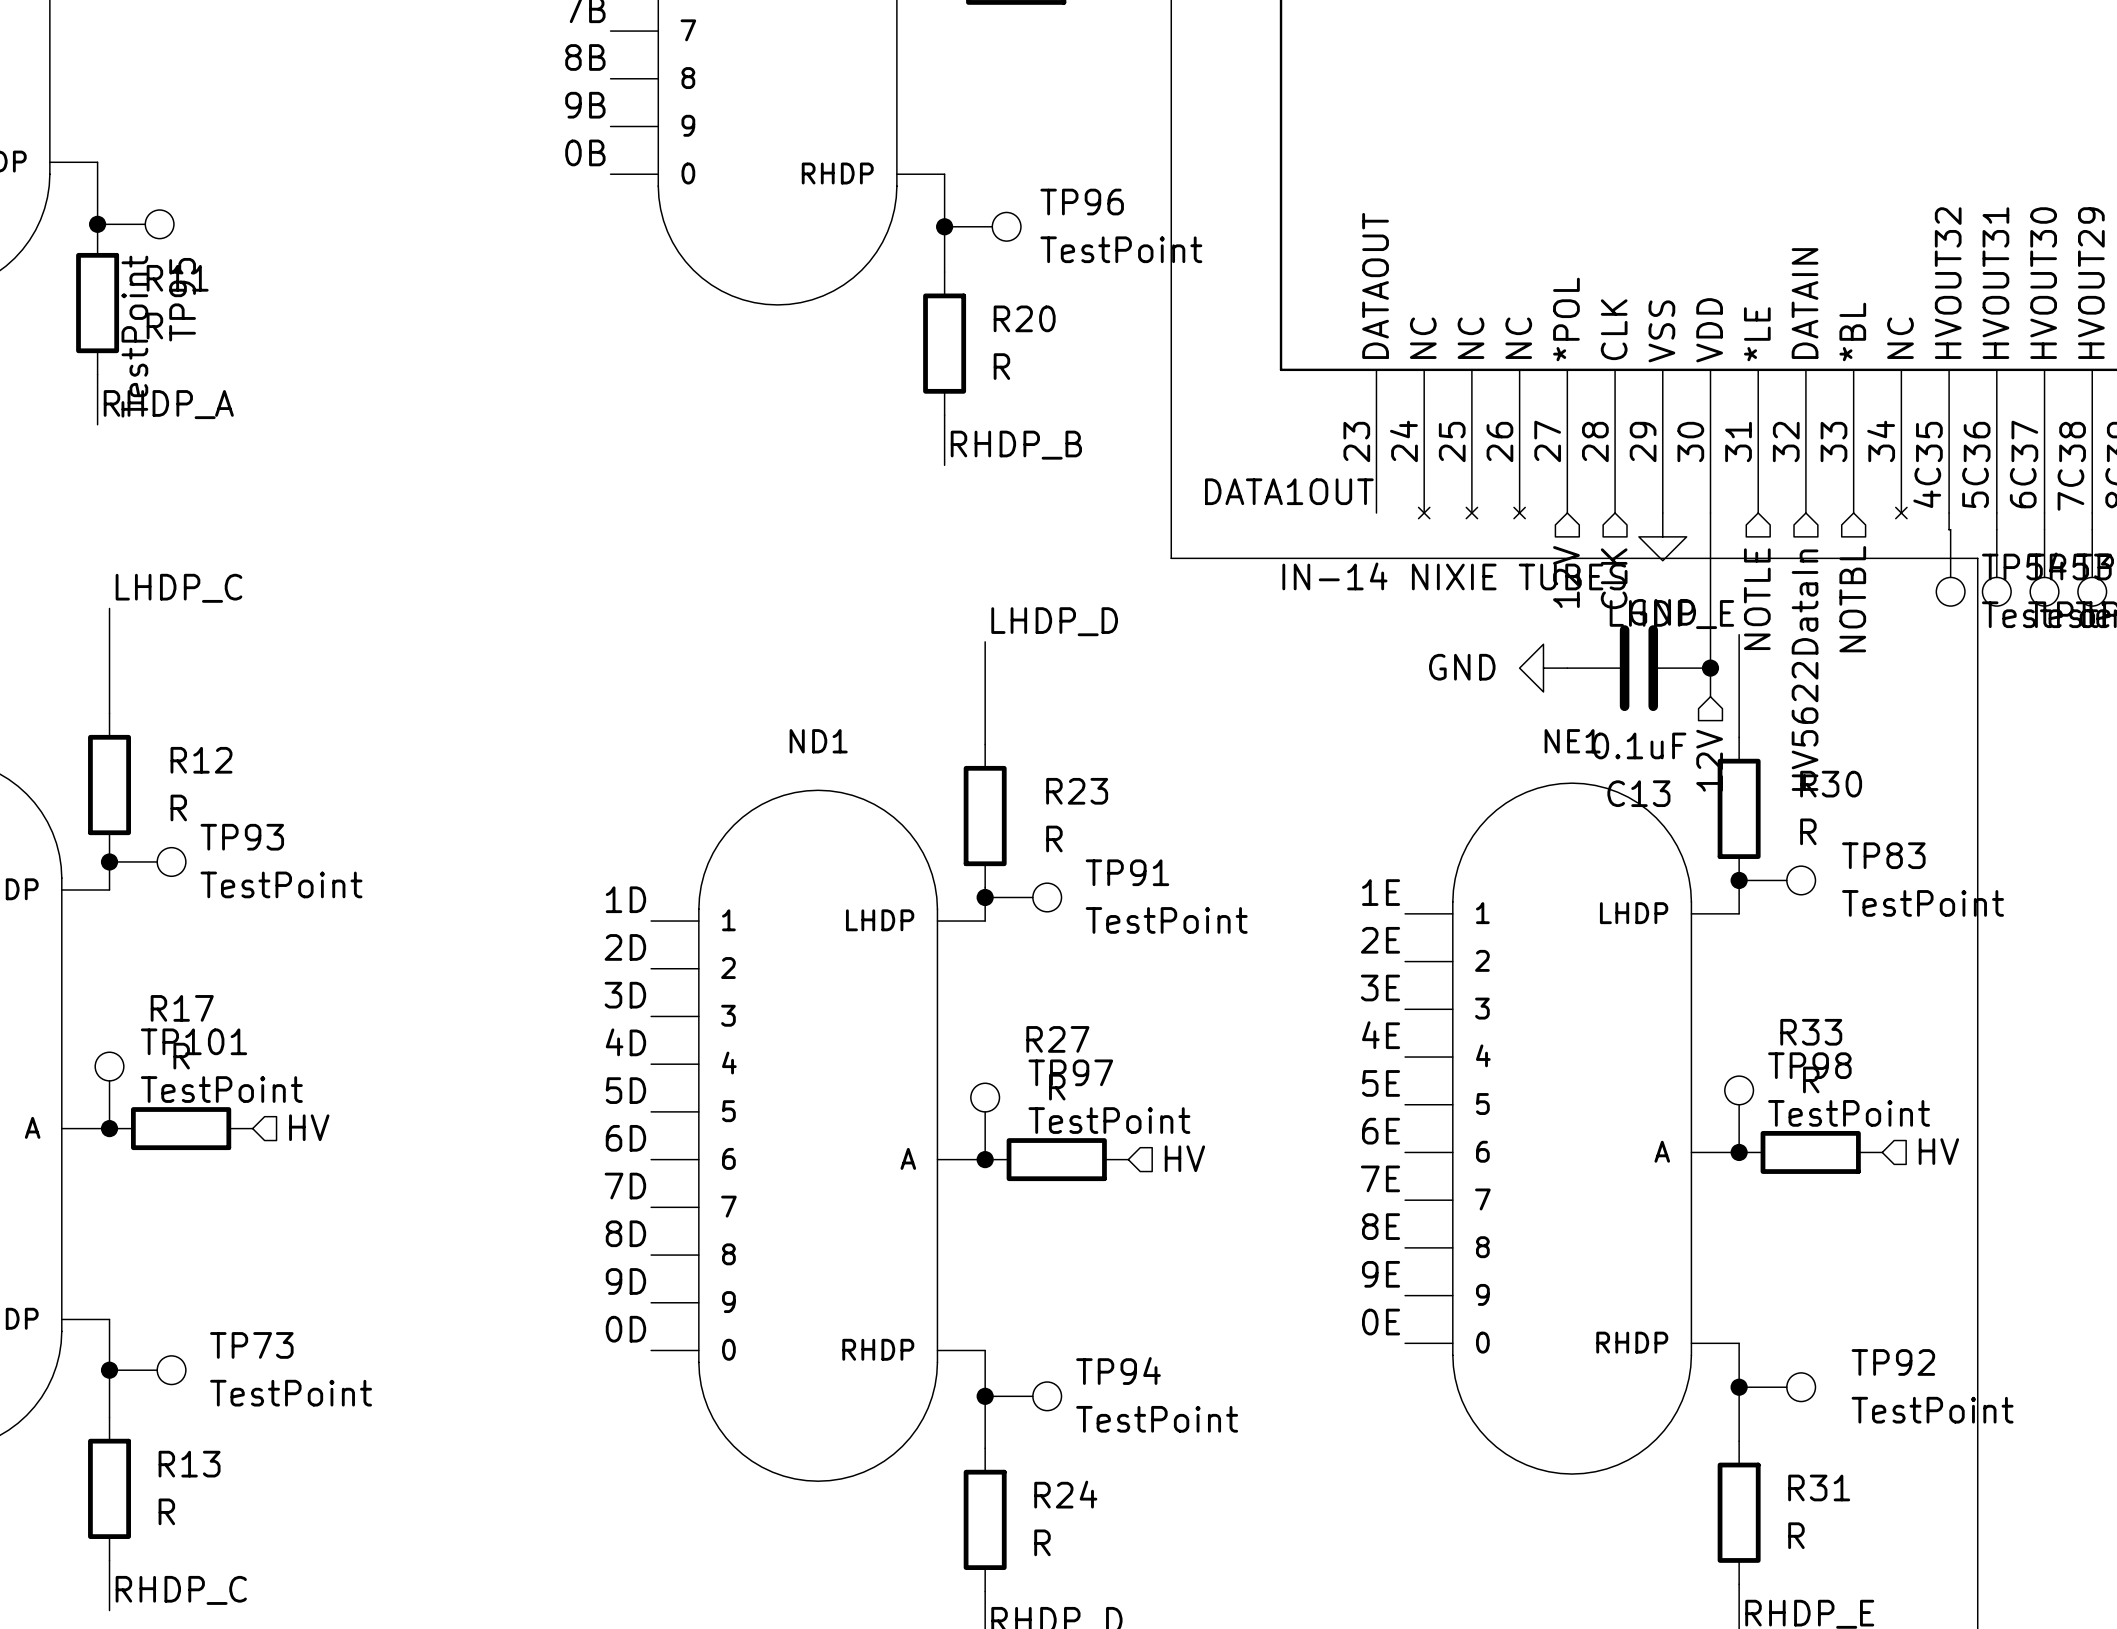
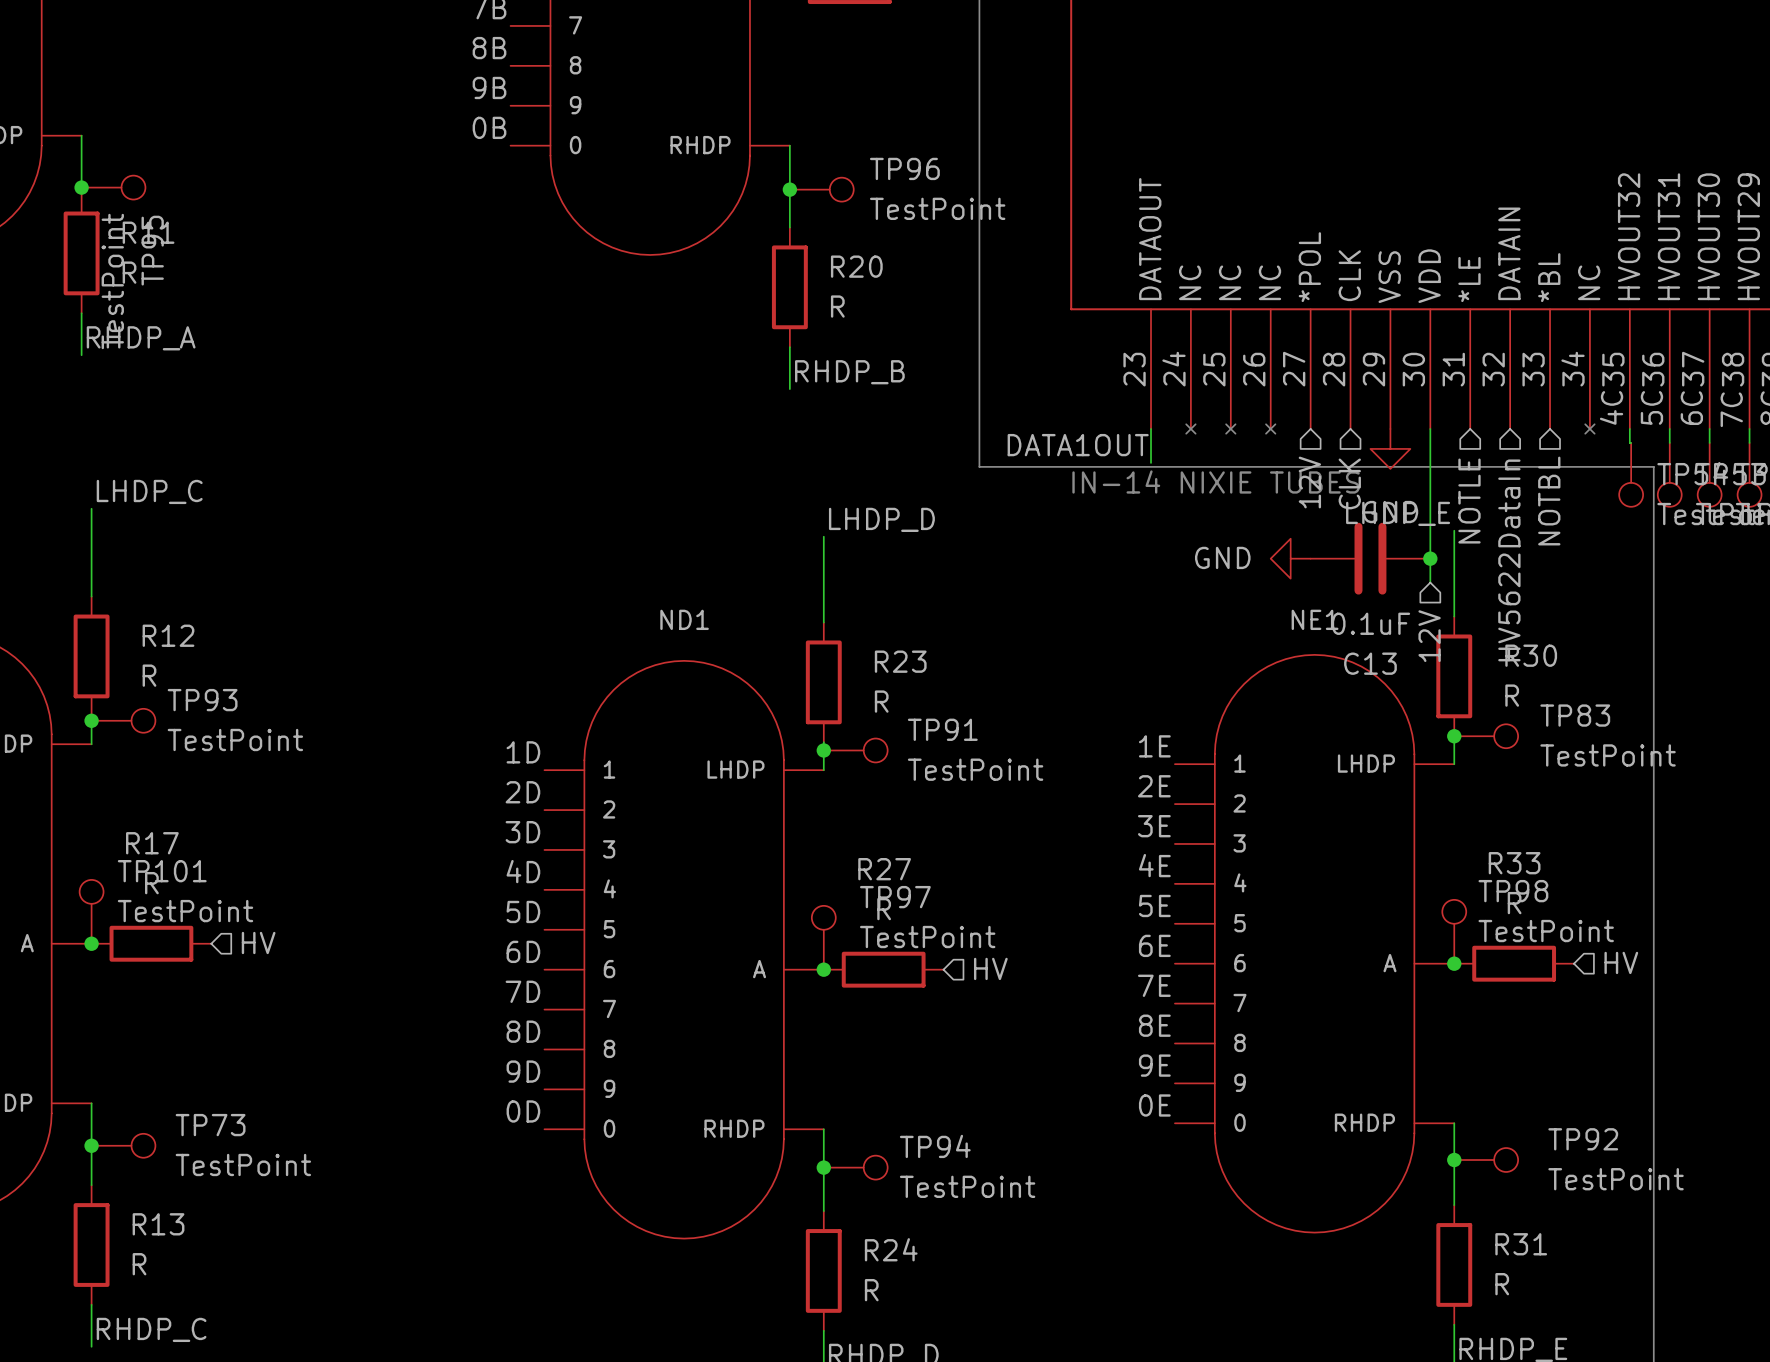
label position: DATA1OUT (1289, 491) -> DATA1OUT (1078, 445)
wire: none -> (1151, 428) (1151, 462)

